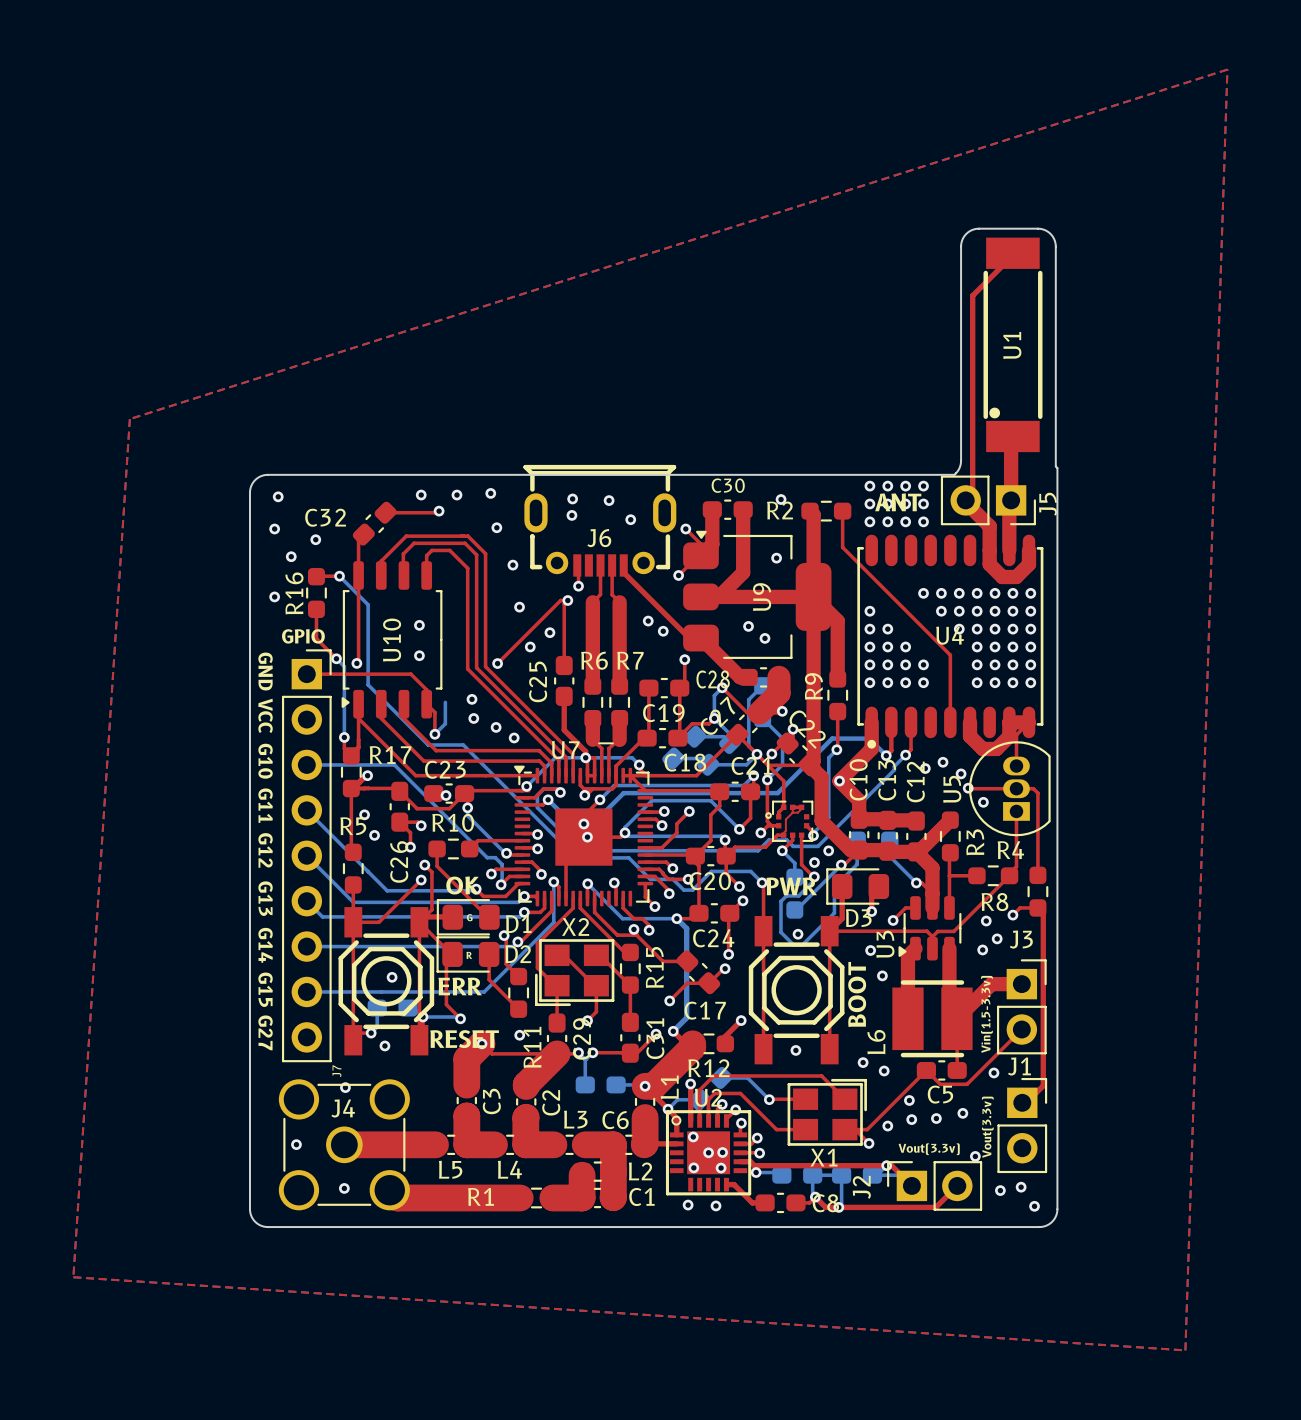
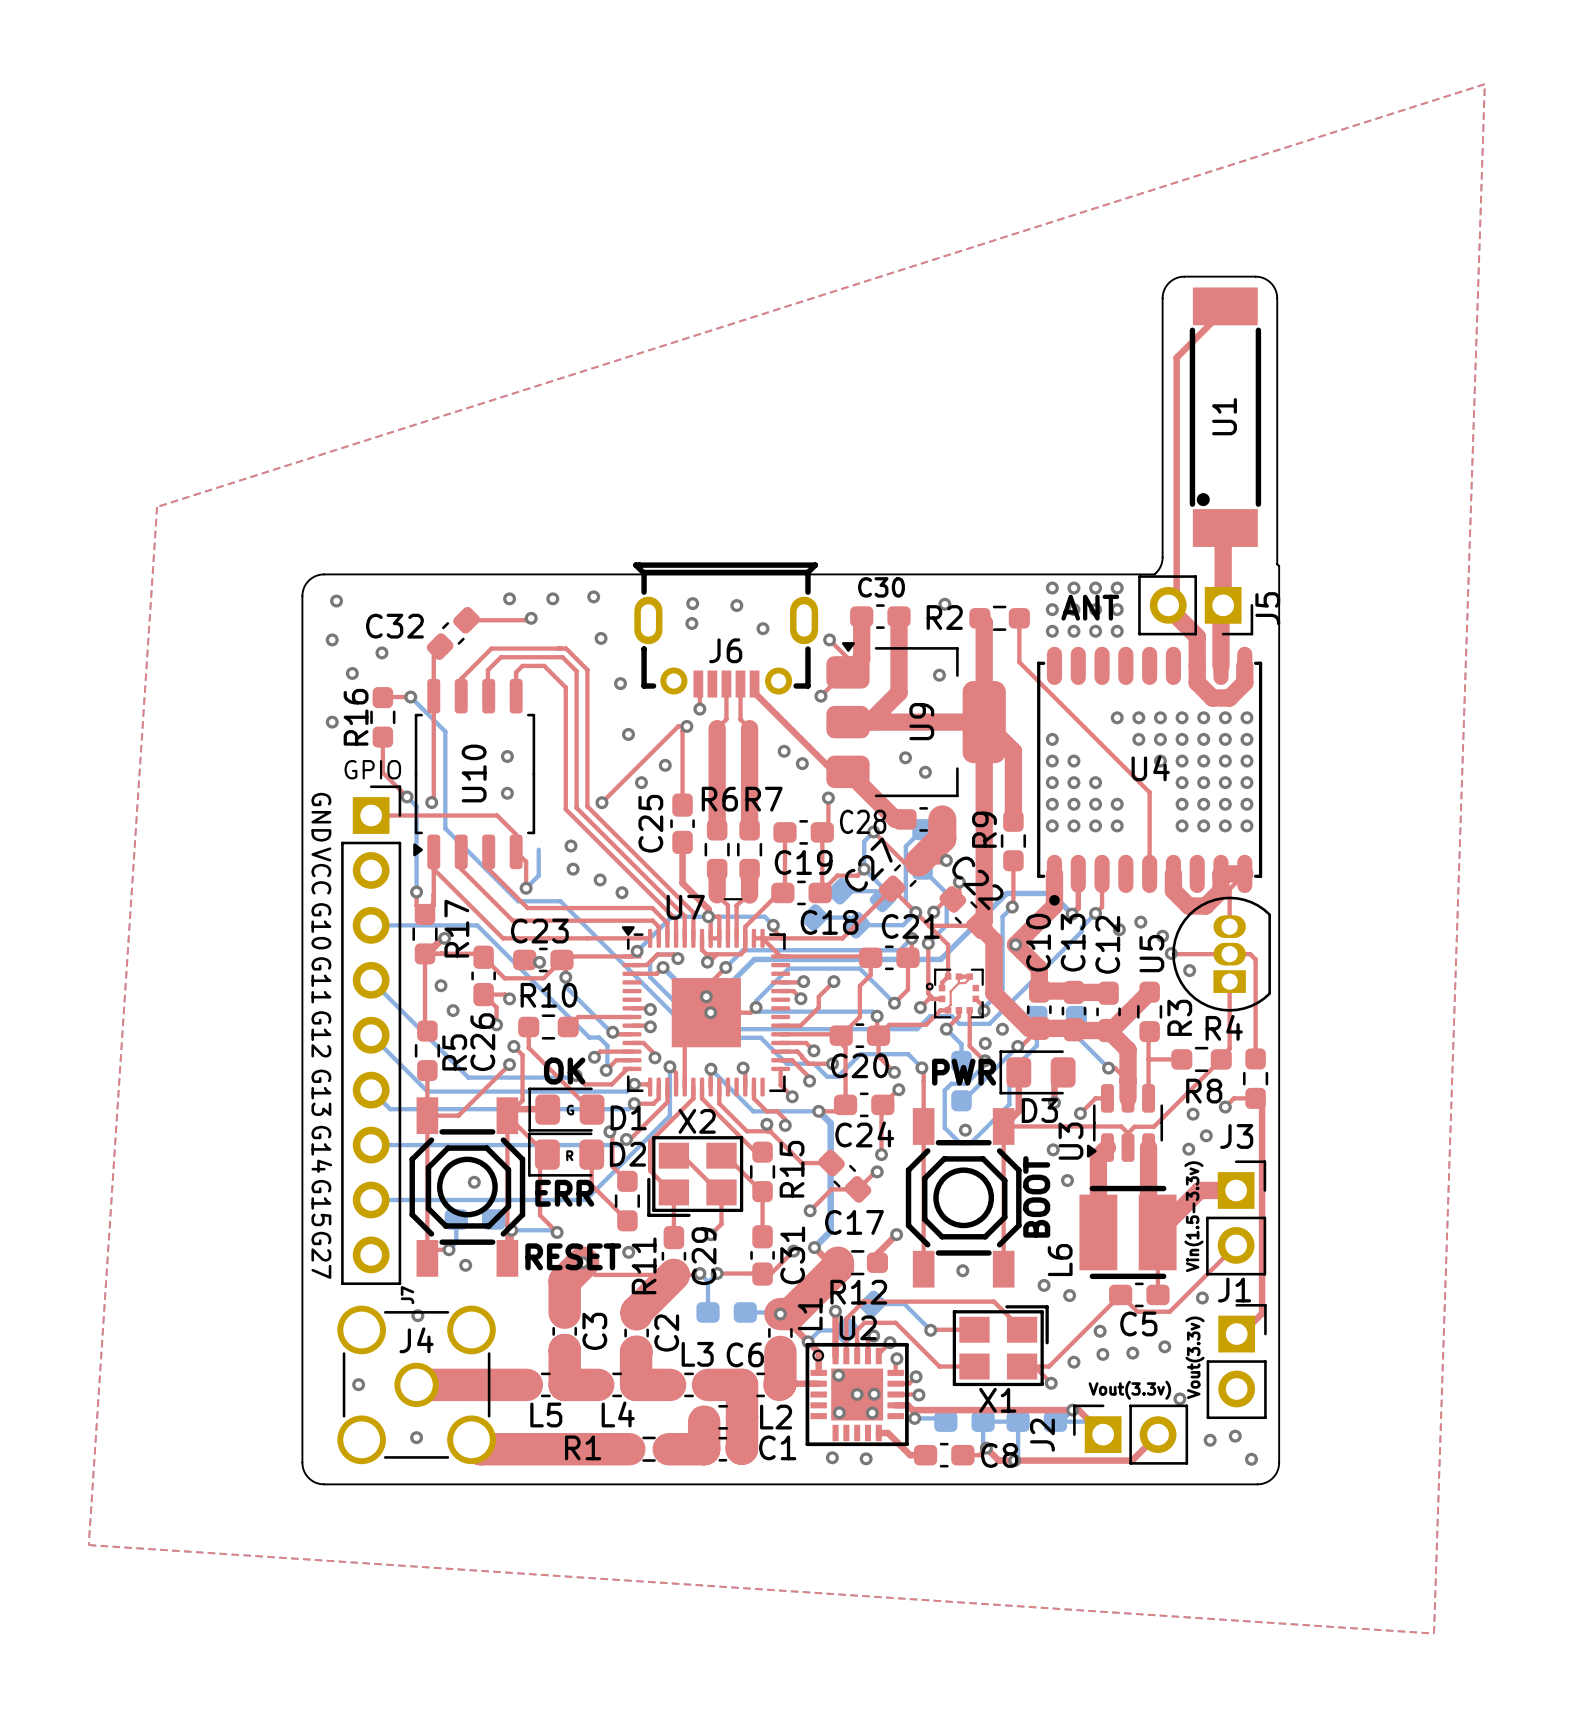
R17 name rotation: 0° (390, 754) -> 90° counterclockwise (456, 928)
R5 name rotation: 0° (353, 826) -> 90° counterclockwise (454, 1052)
R5 name position: R5 (353, 826) -> R5 (454, 1052)

